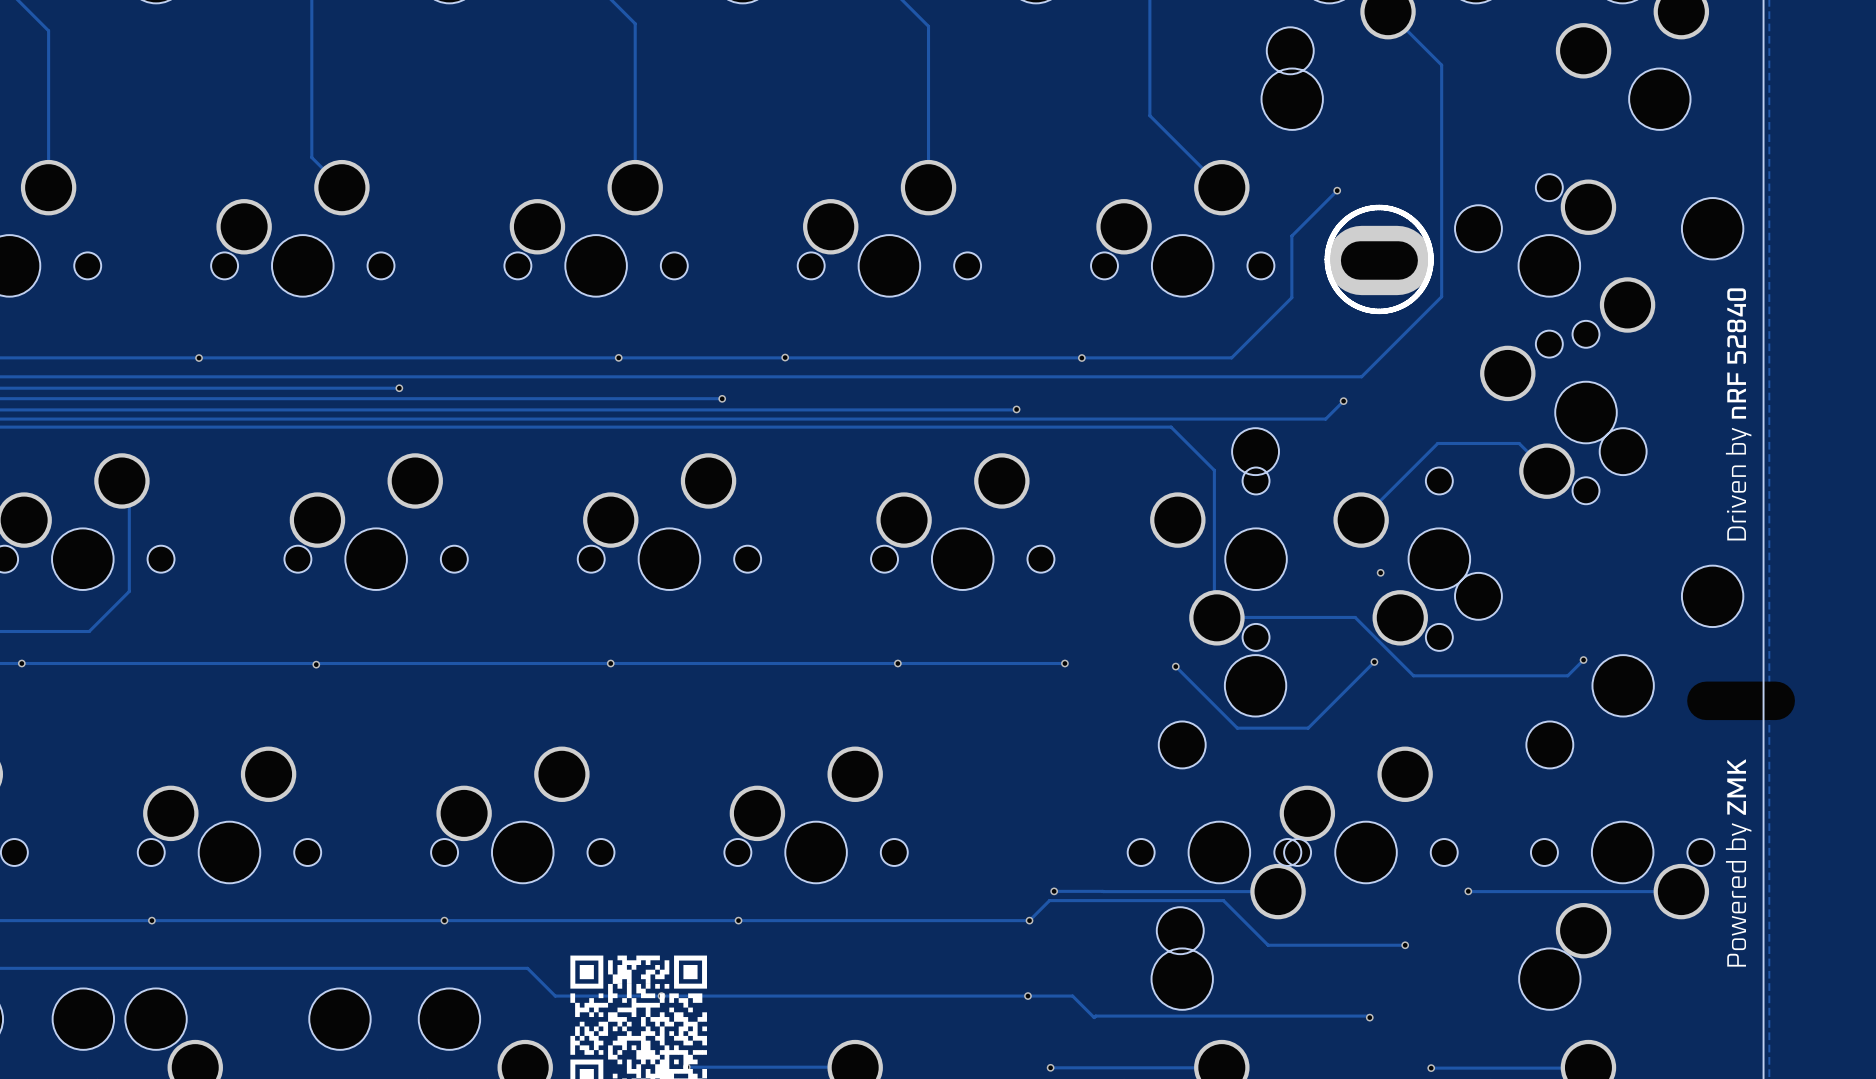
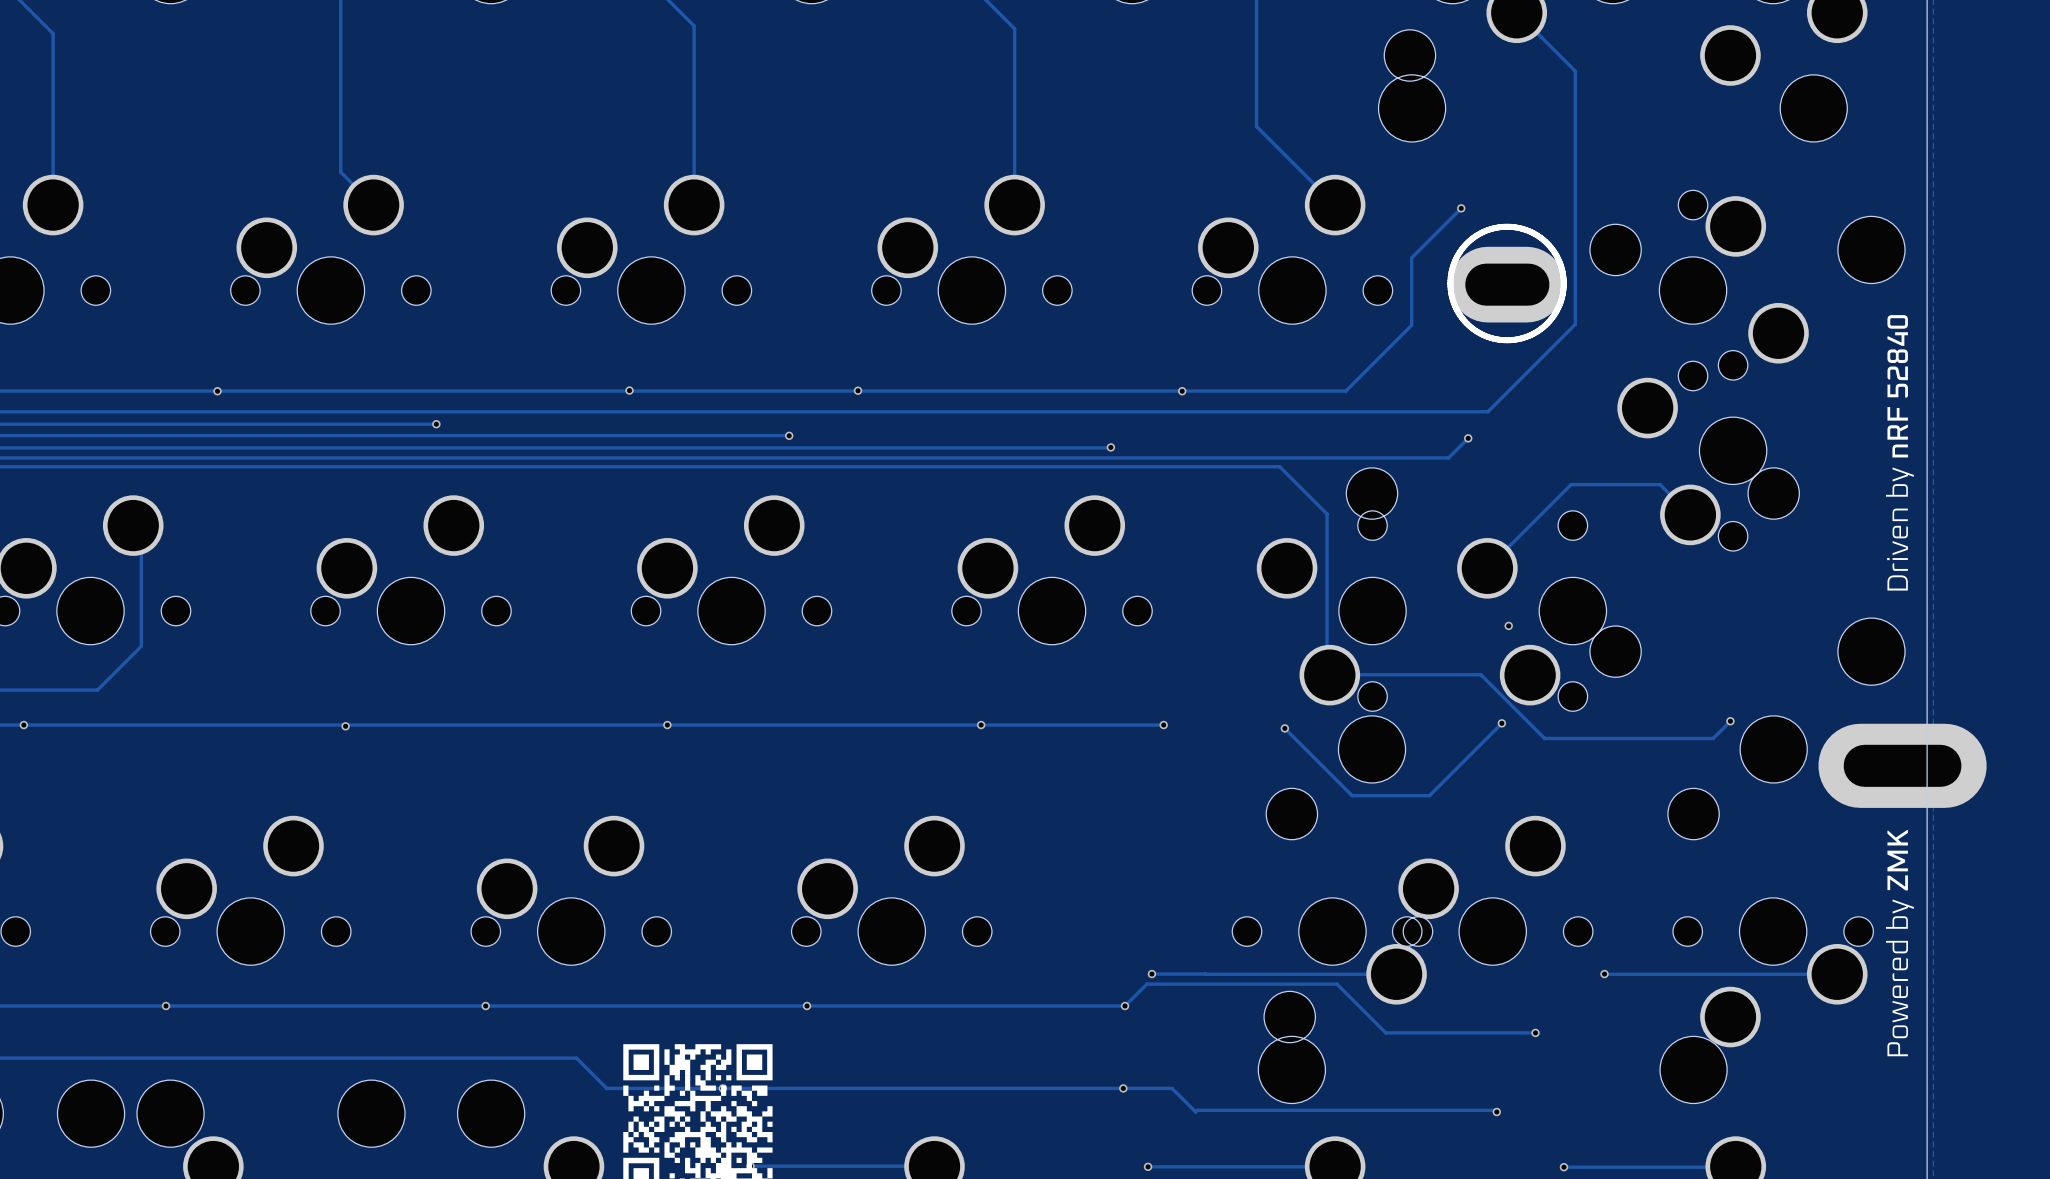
via position: (618, 357) -> (629, 390)
part footprint: [1687, 681, 1795, 721] -> [1818, 723, 1987, 808]

